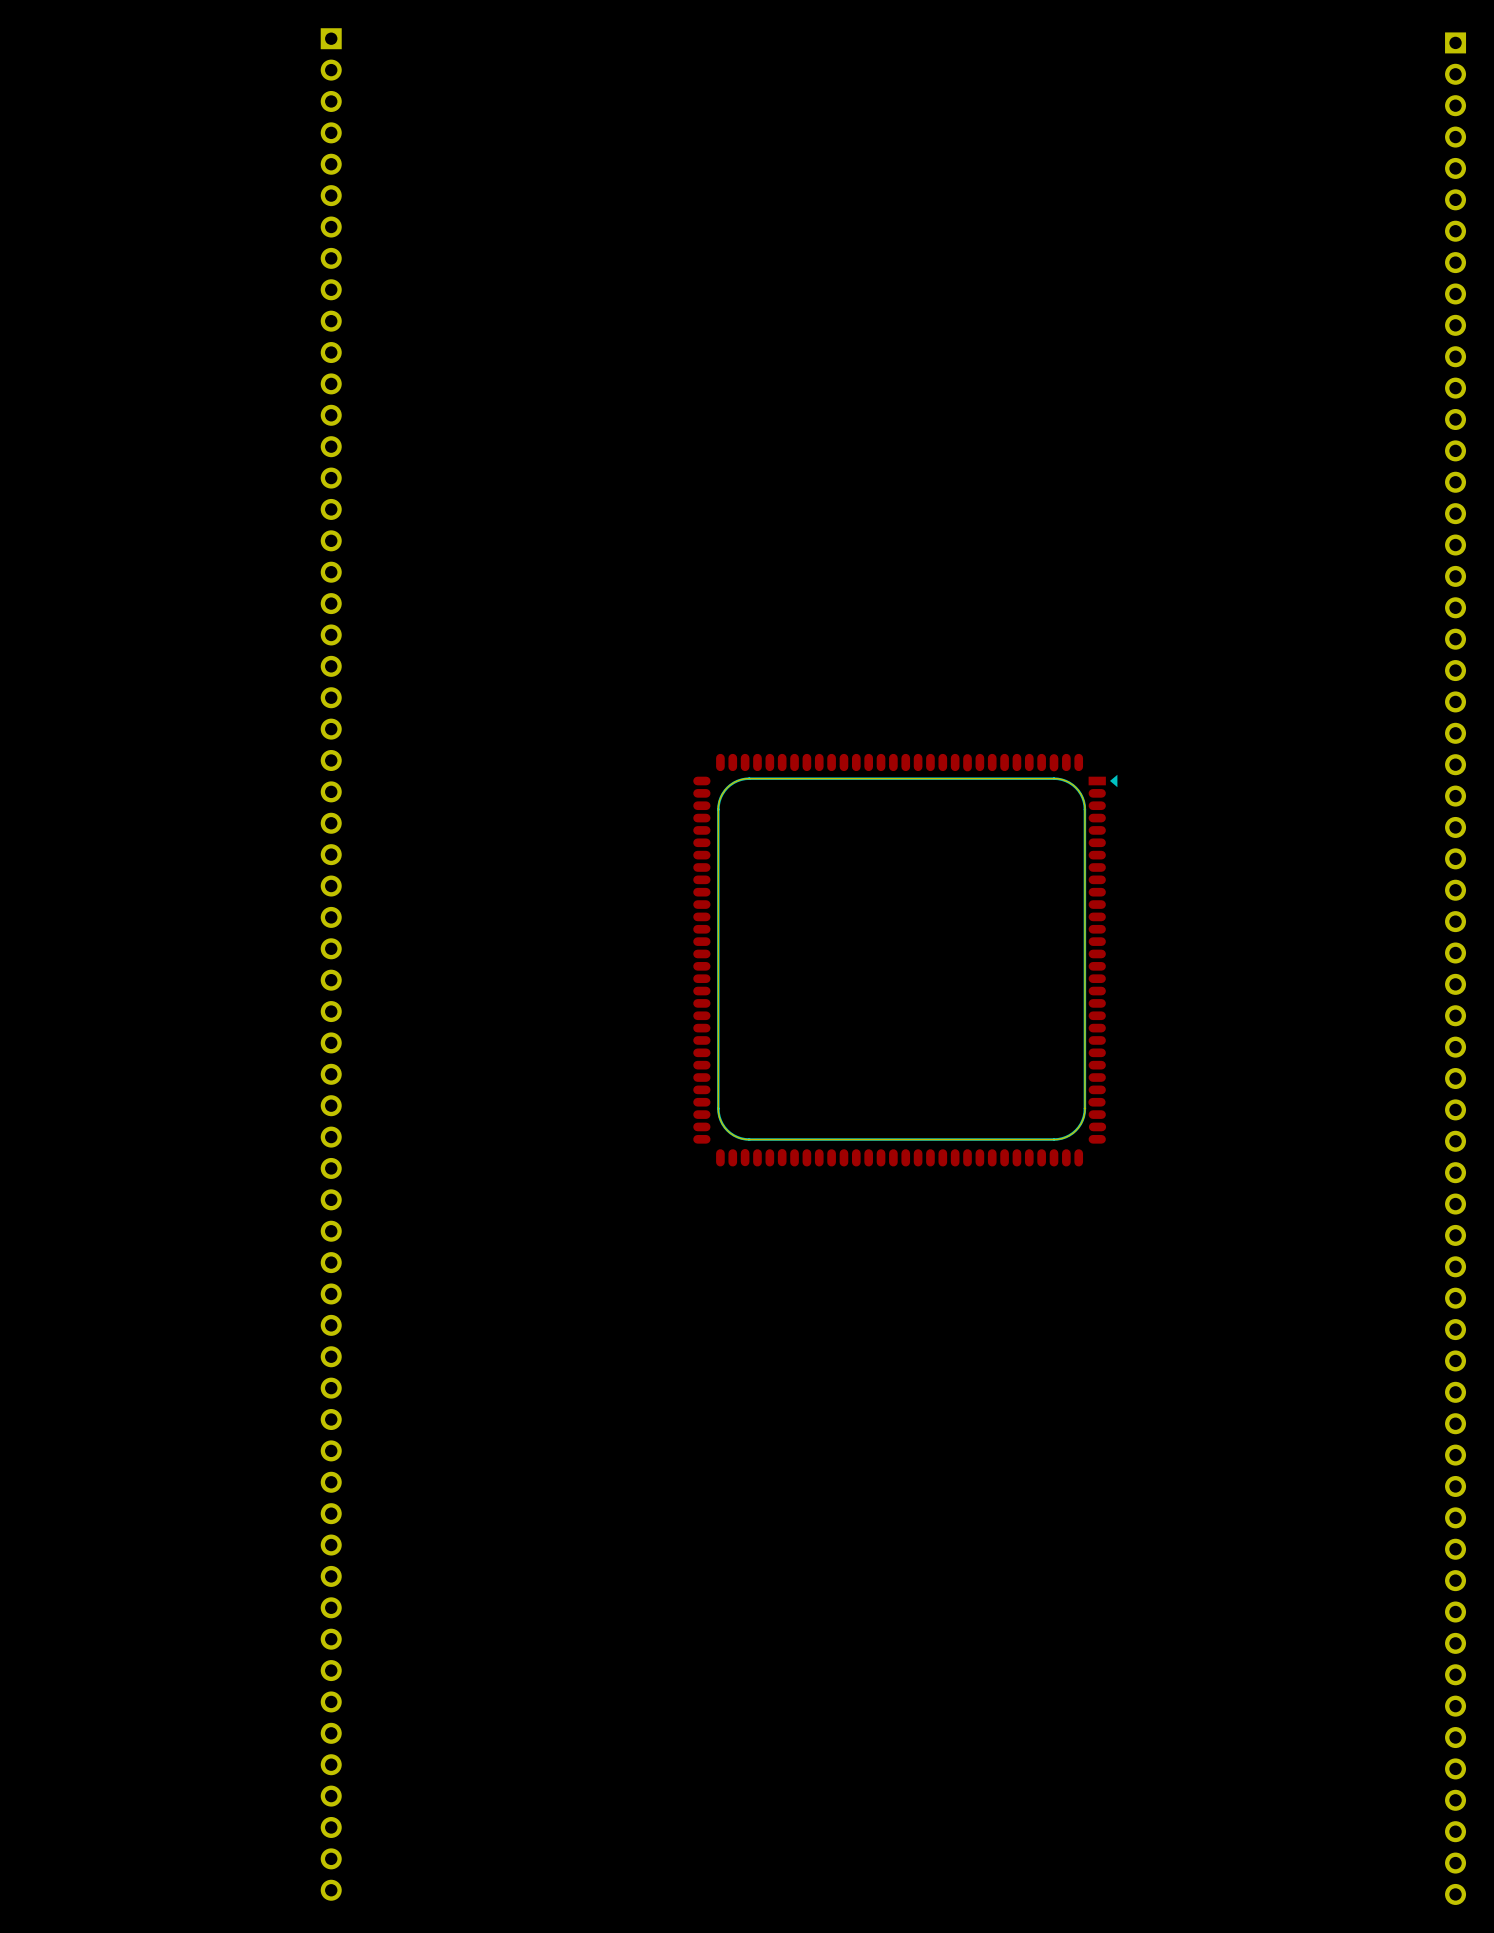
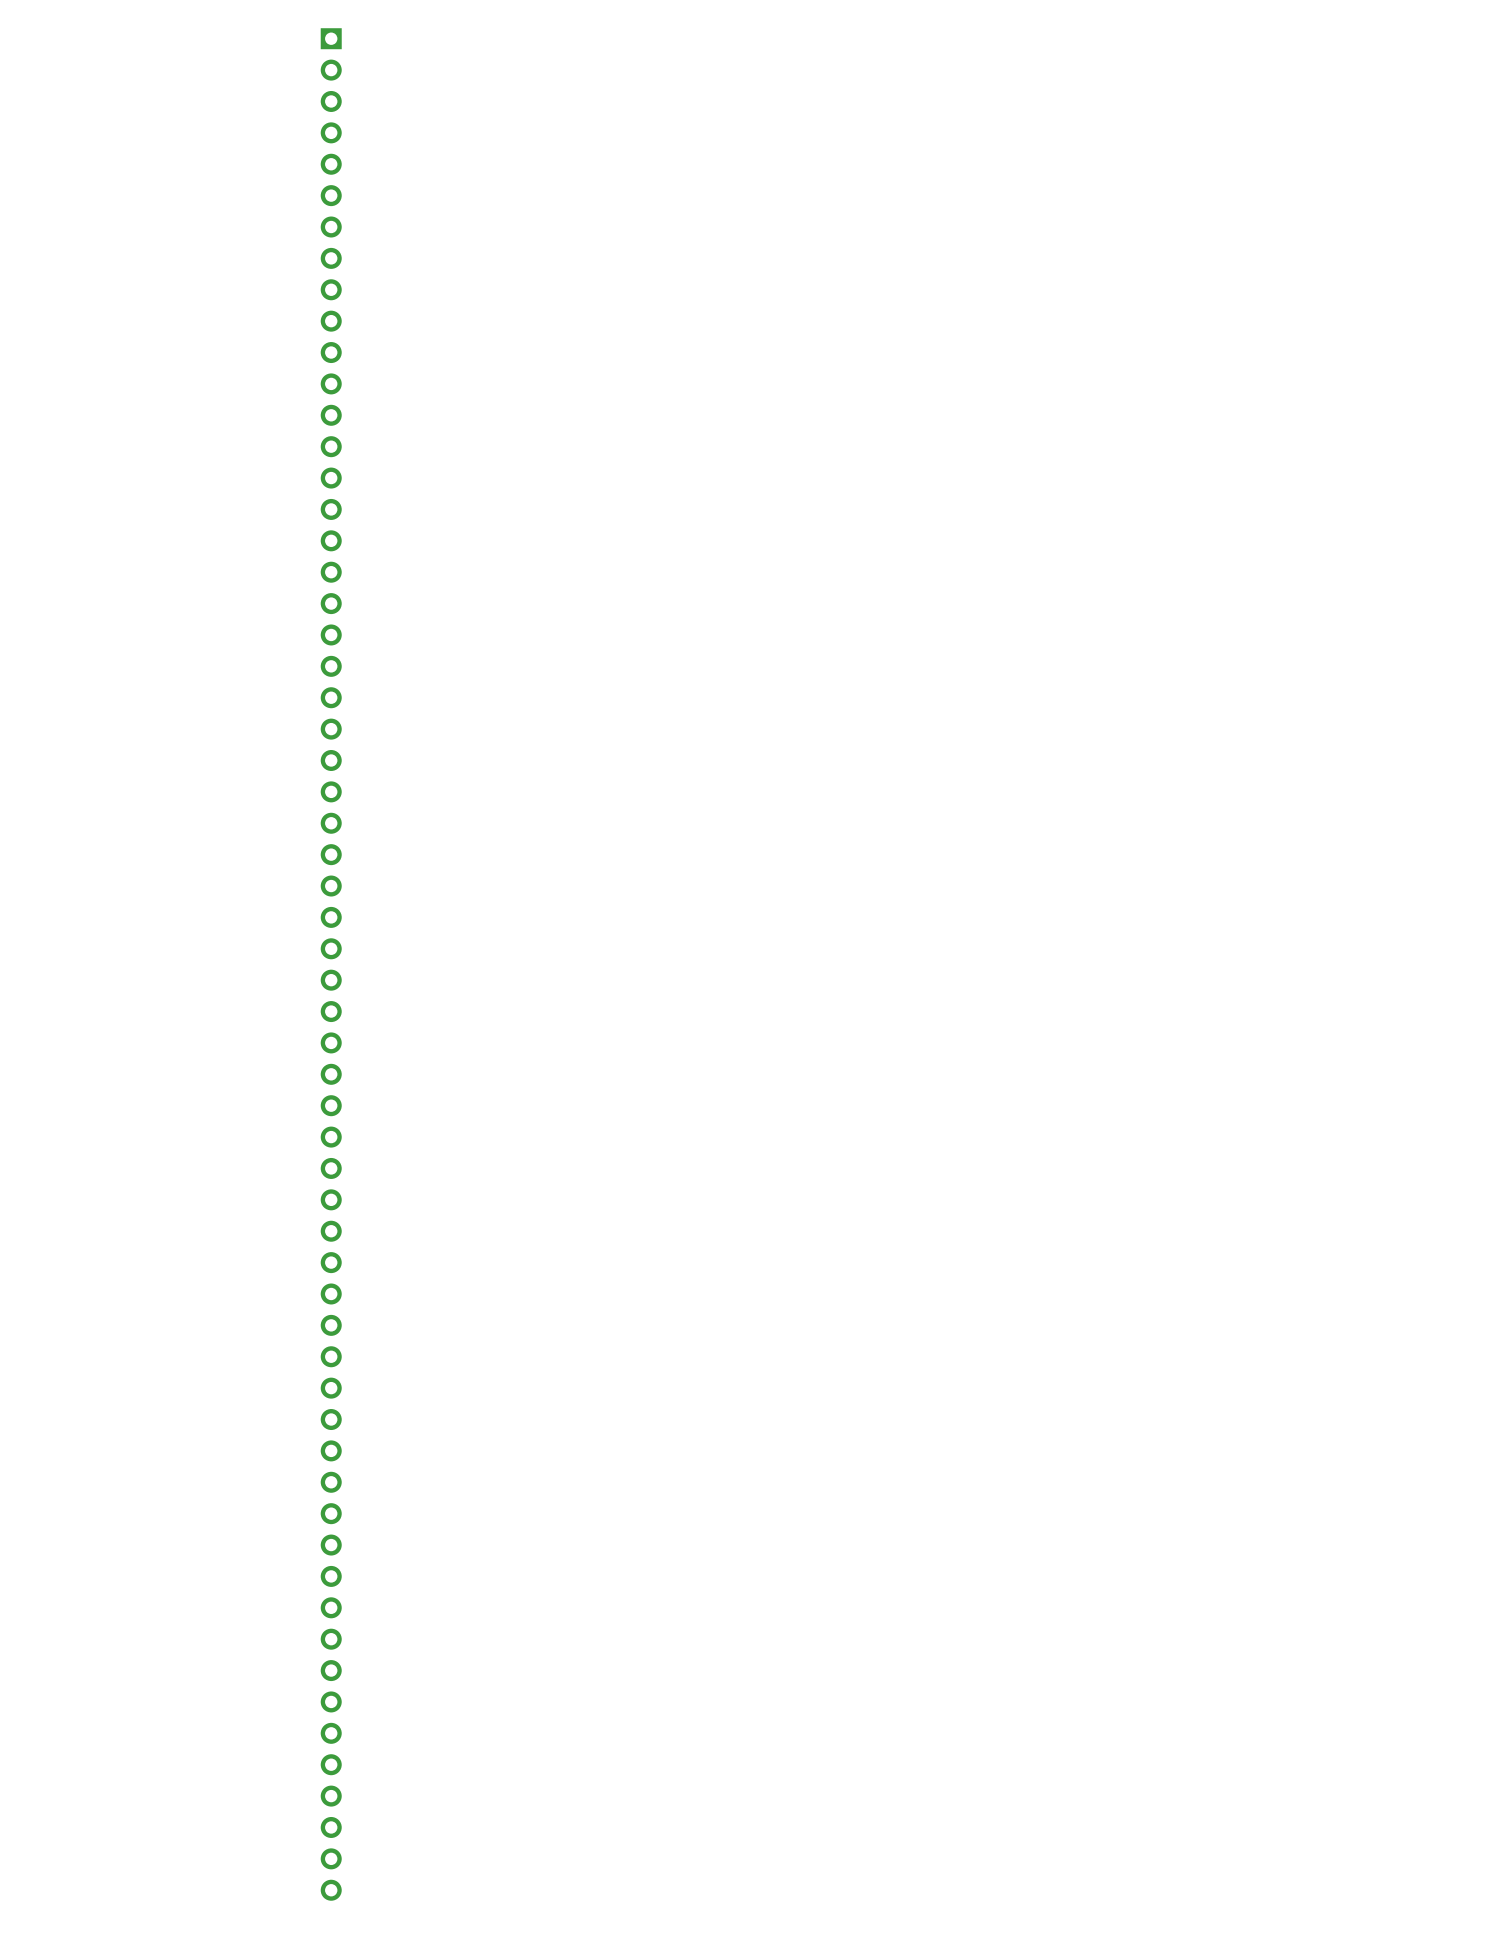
part: (905, 960) -> none
part: (1455, 968) -> none

